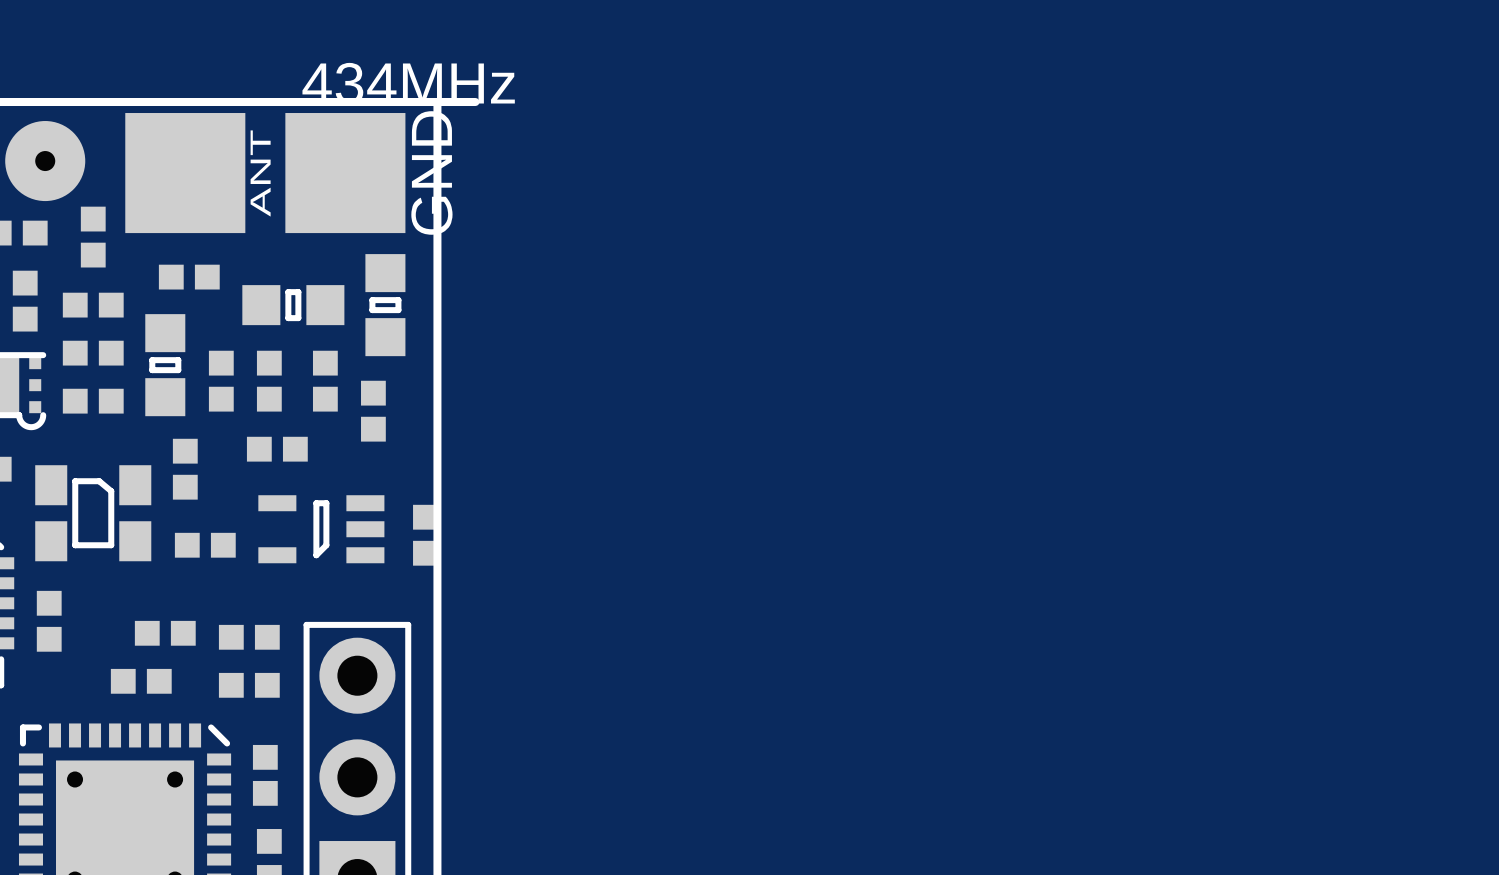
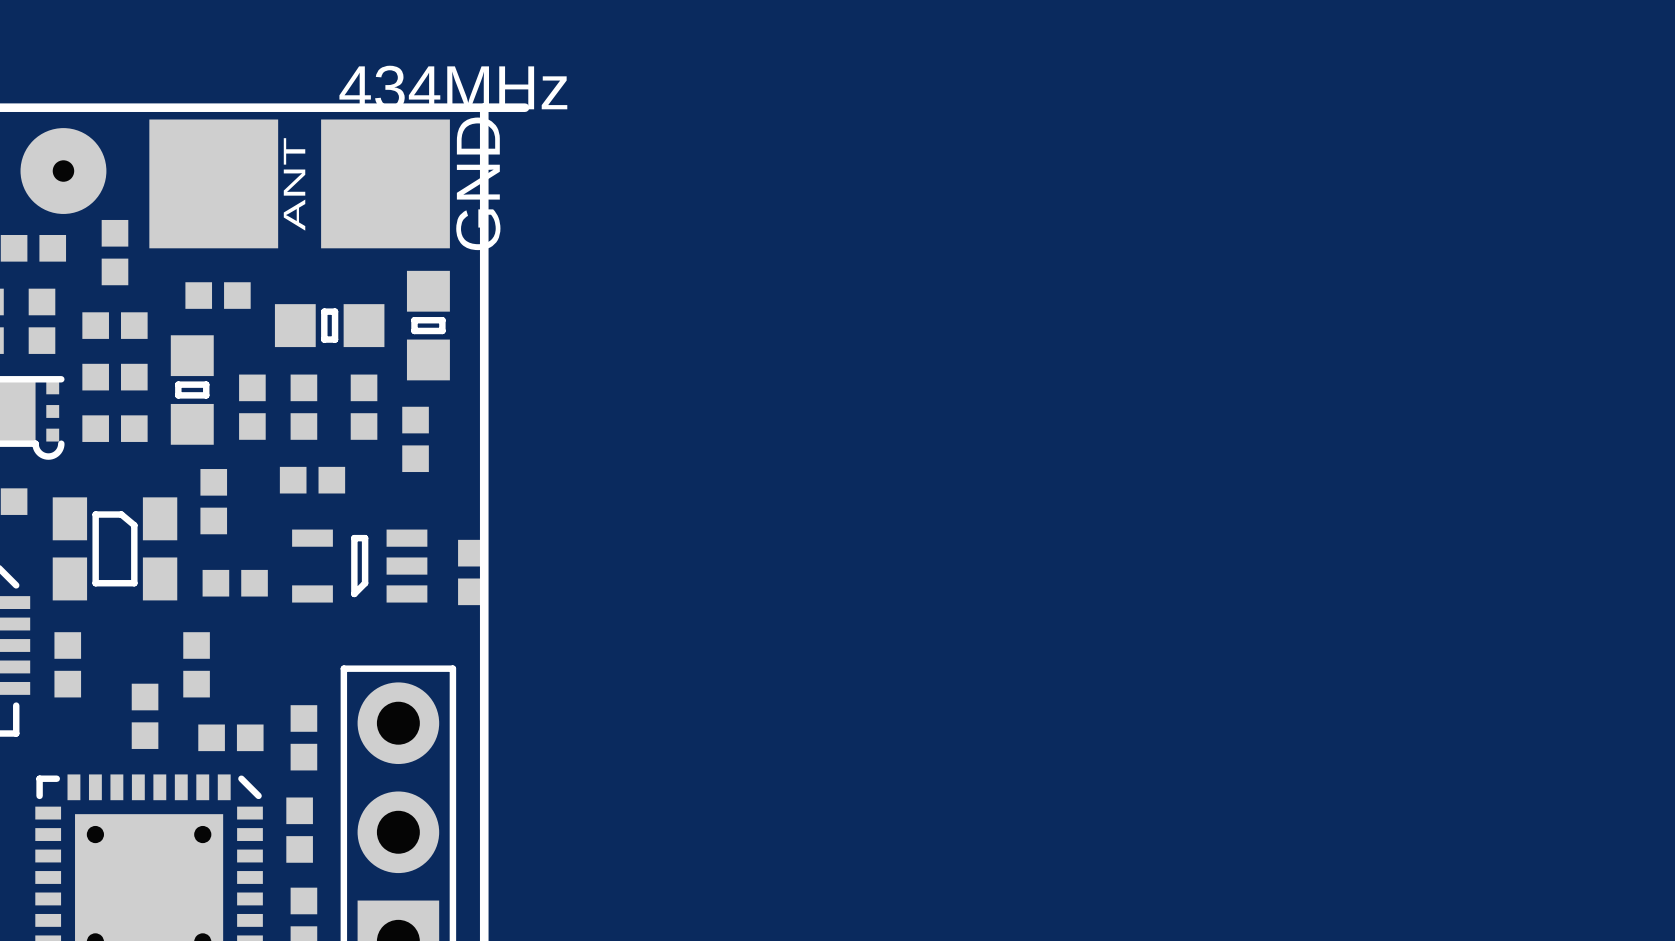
part rotation: 0° (165, 633) -> 90° clockwise (196, 664)
part position: (249, 637) -> (230, 737)
part rotation: 0° (141, 681) -> 90° clockwise (145, 716)
part rotation: 0° (249, 685) -> 90° clockwise (303, 737)

